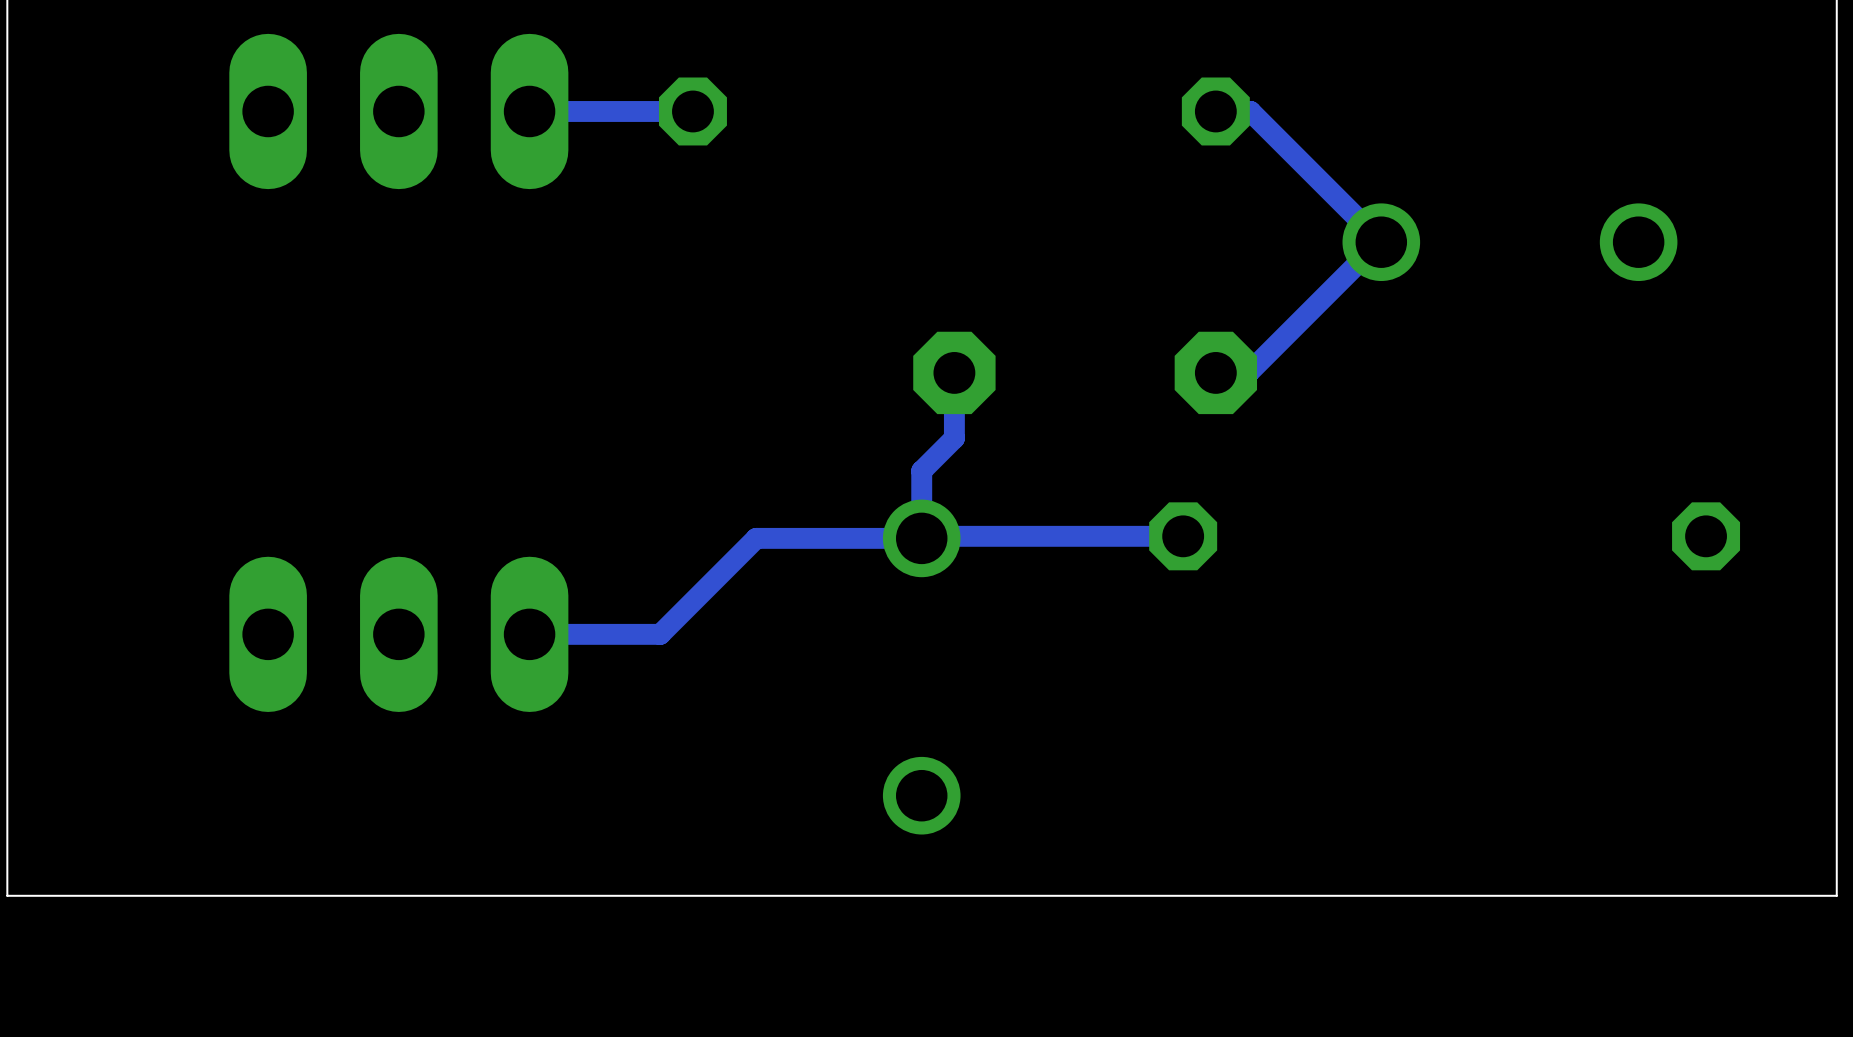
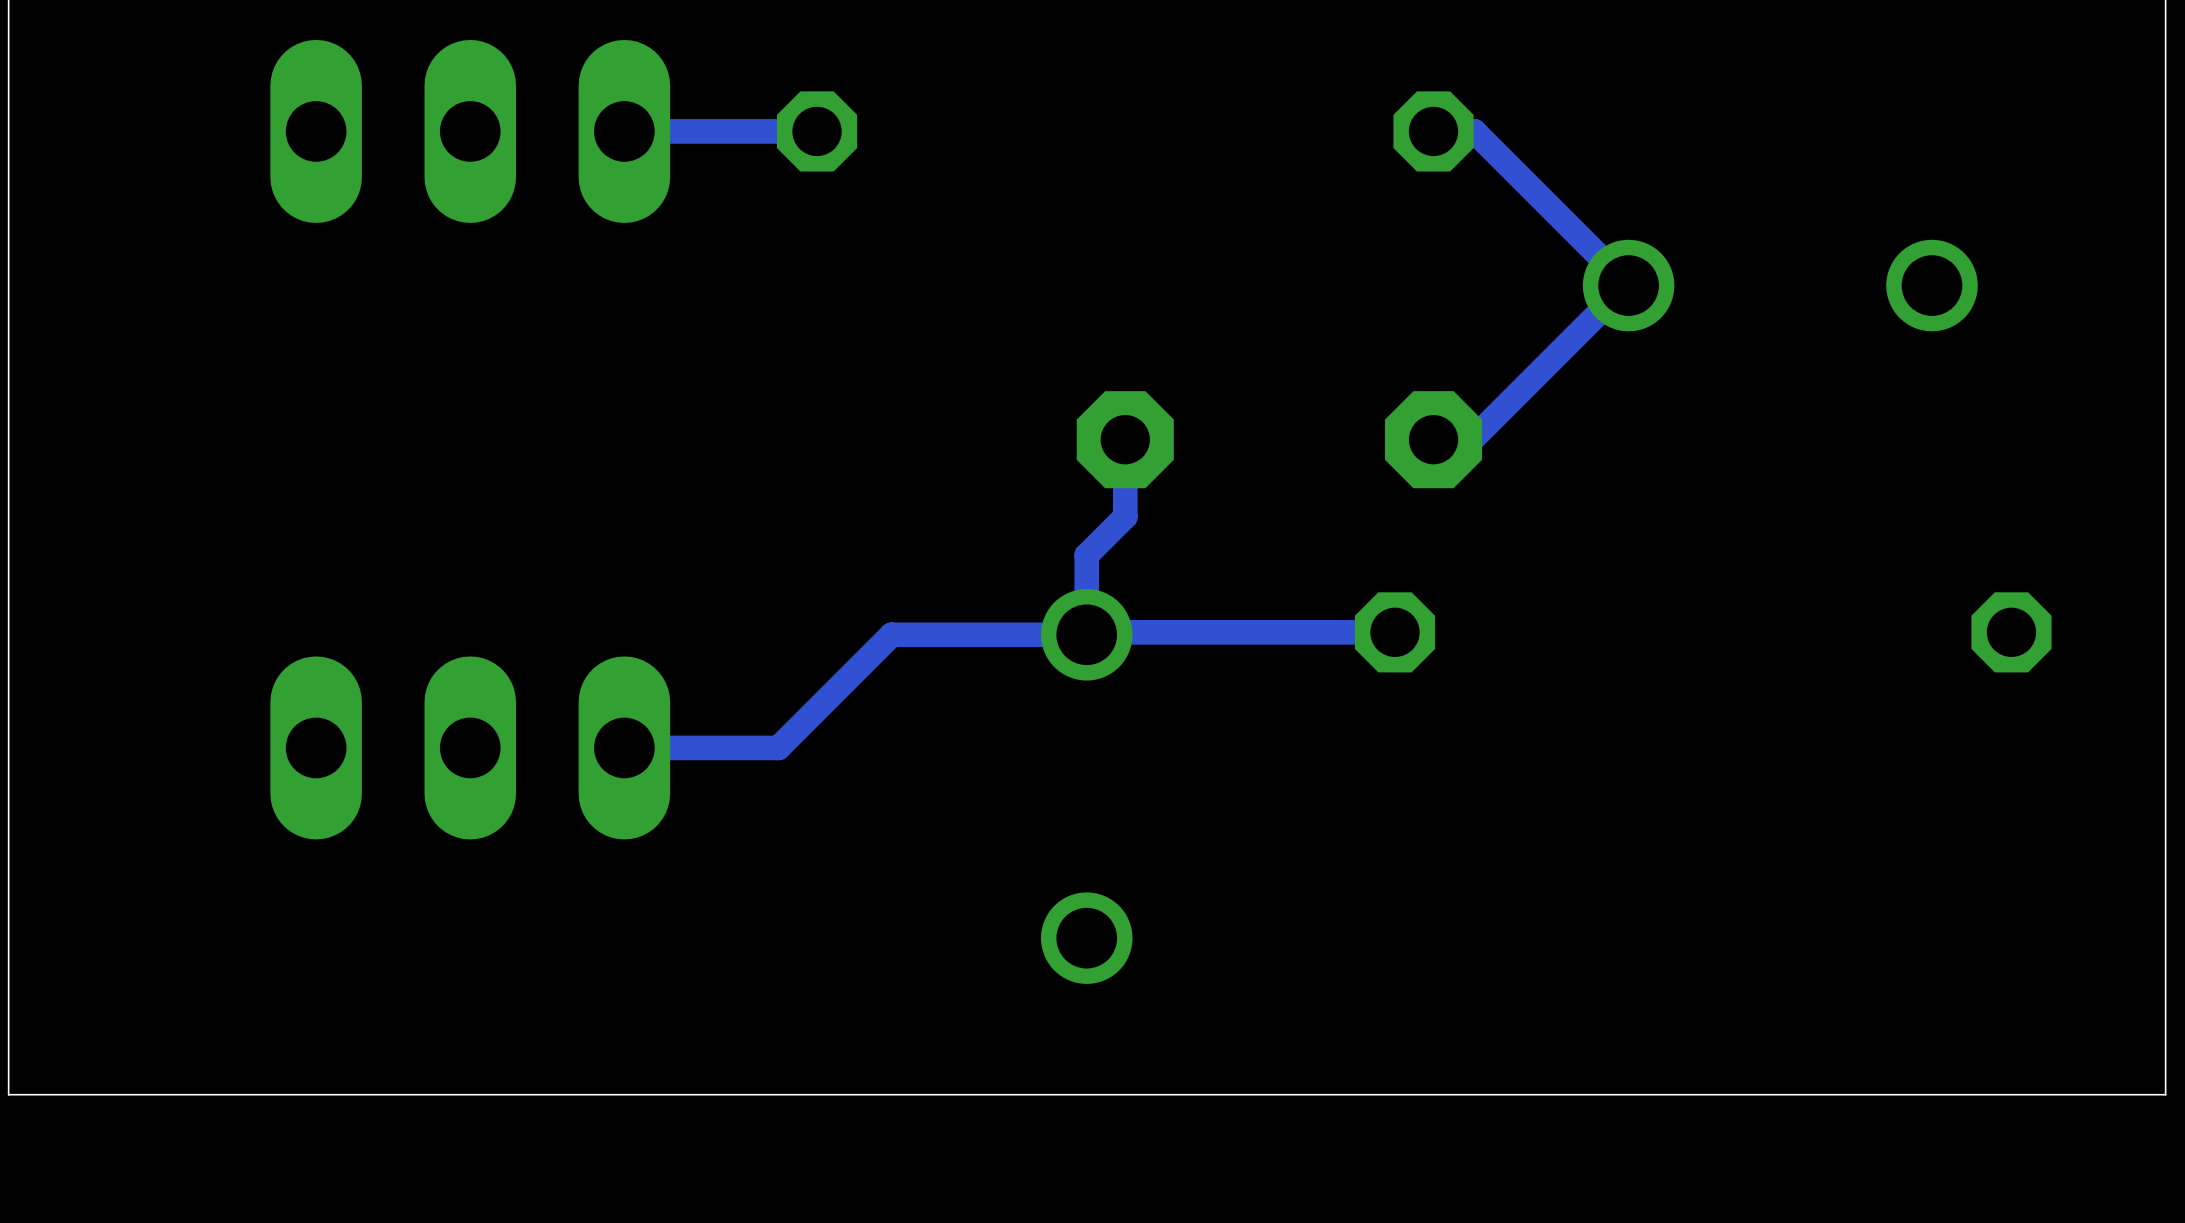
board edge: (1836, 895) (7, 895) -> (2165, 1056) (2165, 1094) (8, 1094) (8, 1056)

